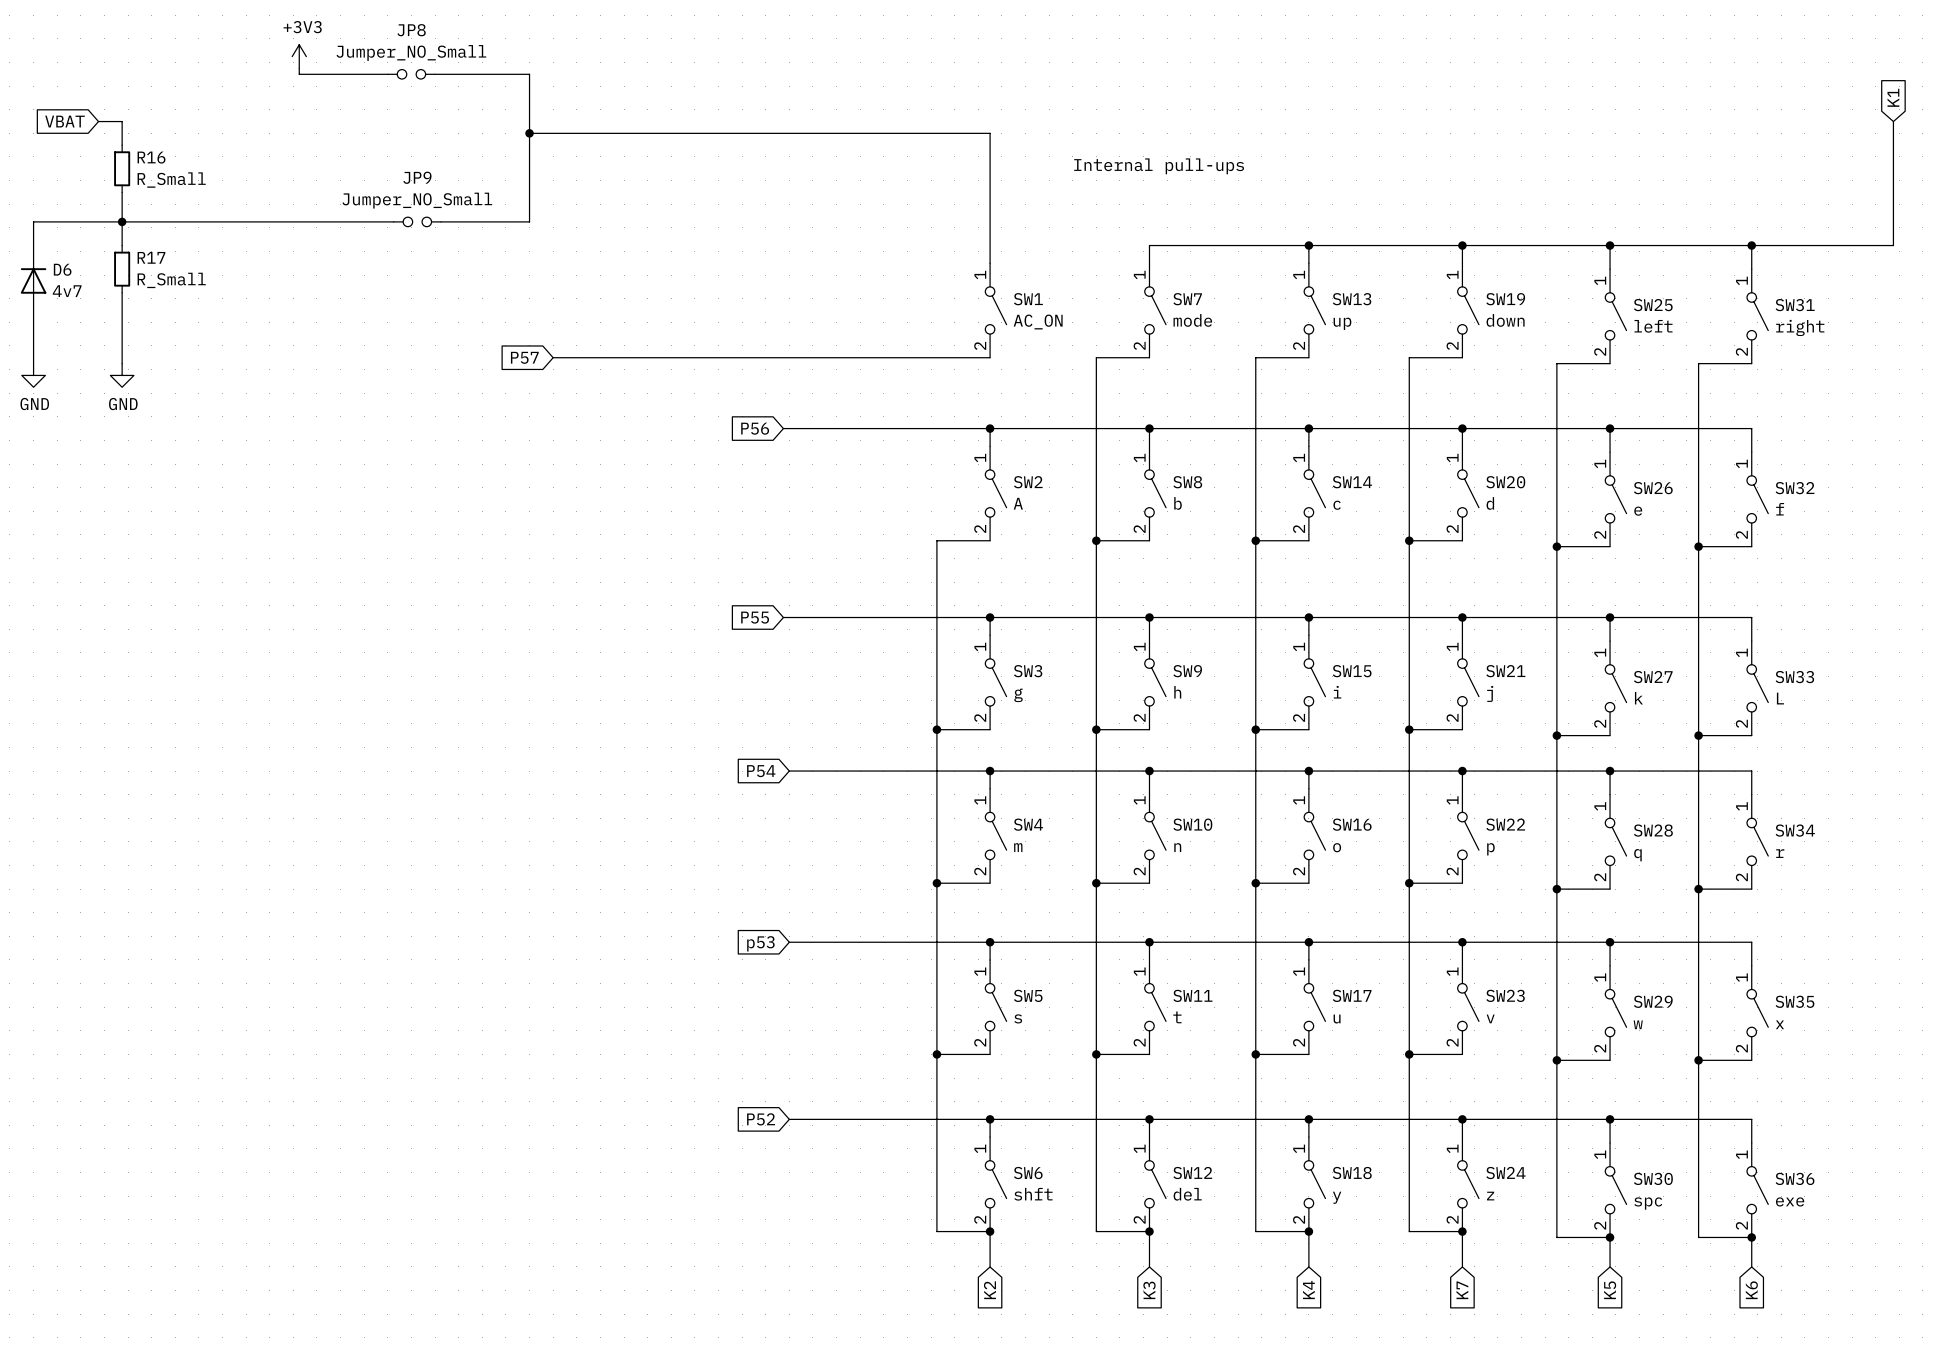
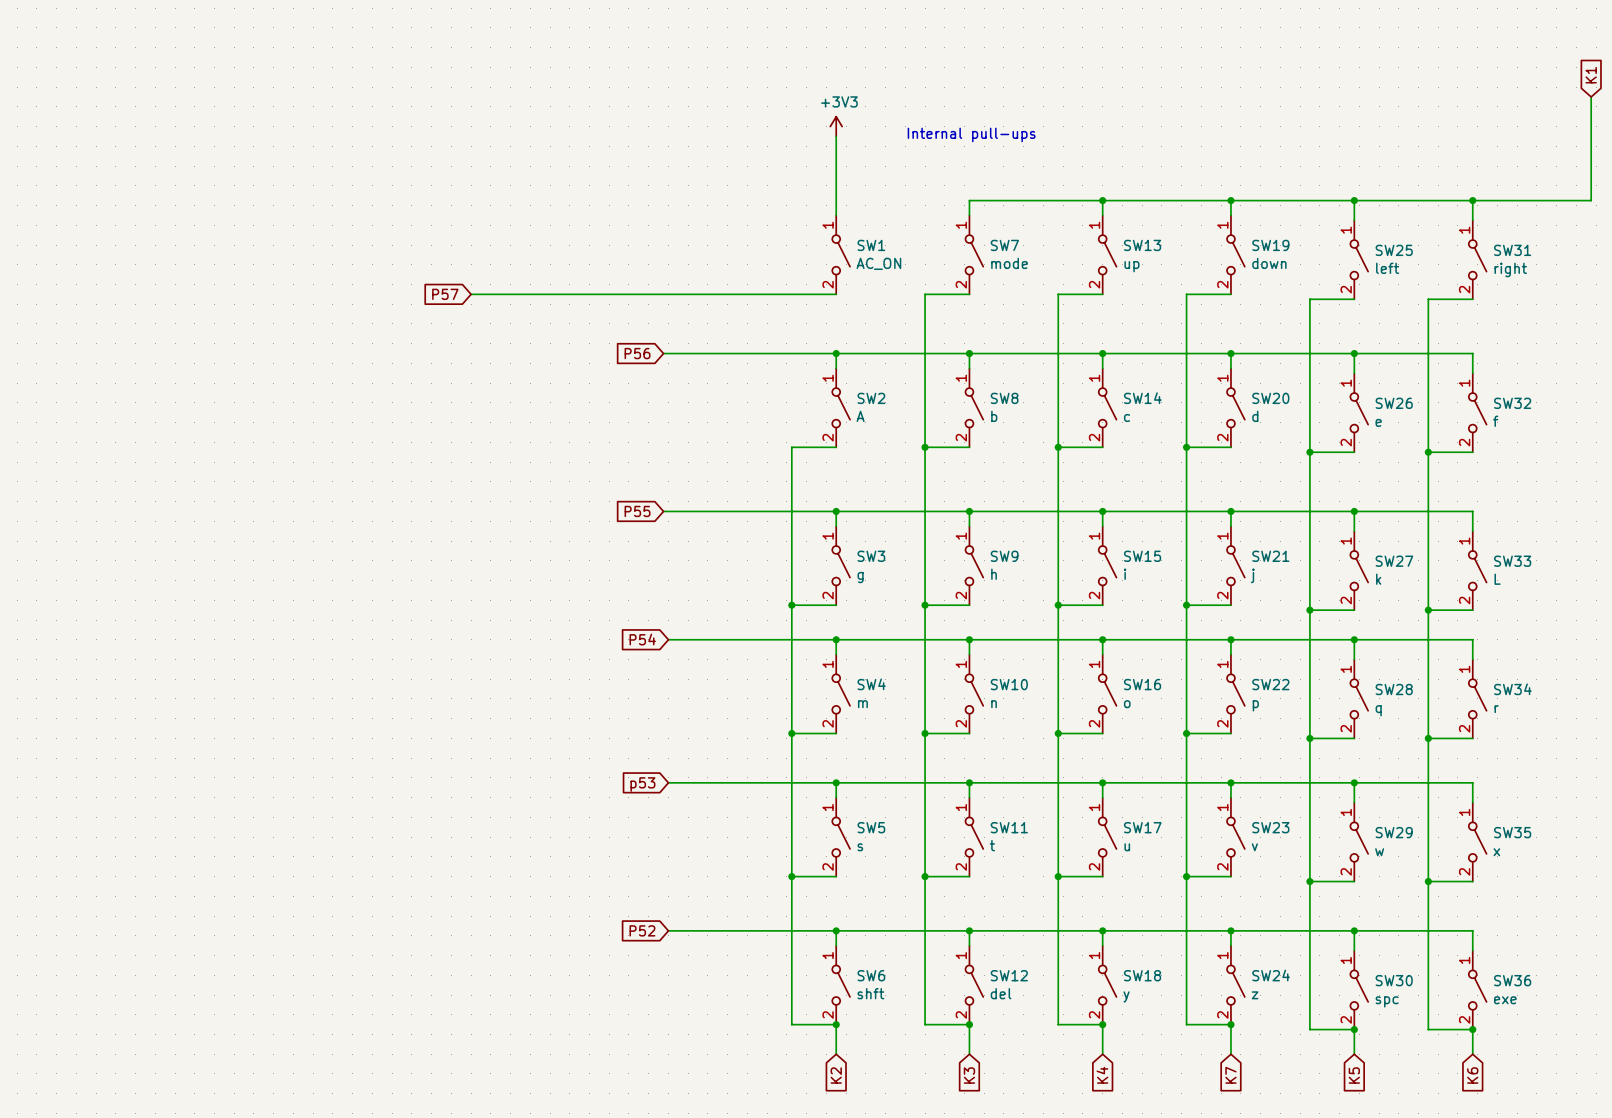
power symbol: +3V3 (299, 56) -> none
wire: (299, 68) (299, 74) (387, 74) -> none
JP8: Jumper_NO_Small (411, 74) -> none
wire: (435, 74) (529, 74) (529, 221) (440, 221) -> none
global label: VBAT (65, 121) -> none
wire: (98, 121) (122, 121) (122, 145) -> none
wire: (529, 133) (990, 133) (990, 168) -> none
junction: (529, 133) -> none
power symbol: none -> +3V3 (836, 126)
R16: R_Small (122, 168) -> none
wire: (122, 192) (122, 245) -> none
junction: (122, 221) -> none
wire: (393, 221) (33, 221) (33, 245) -> none
JP9: Jumper_NO_Small (417, 221) -> none
R17: R_Small (122, 269) -> none
D6: 4v7 (33, 280) -> none
wire: (122, 292) (122, 363) -> none
wire: (33, 316) (33, 363) -> none
power symbol: GND (33, 375) -> none
power symbol: GND (122, 375) -> none

